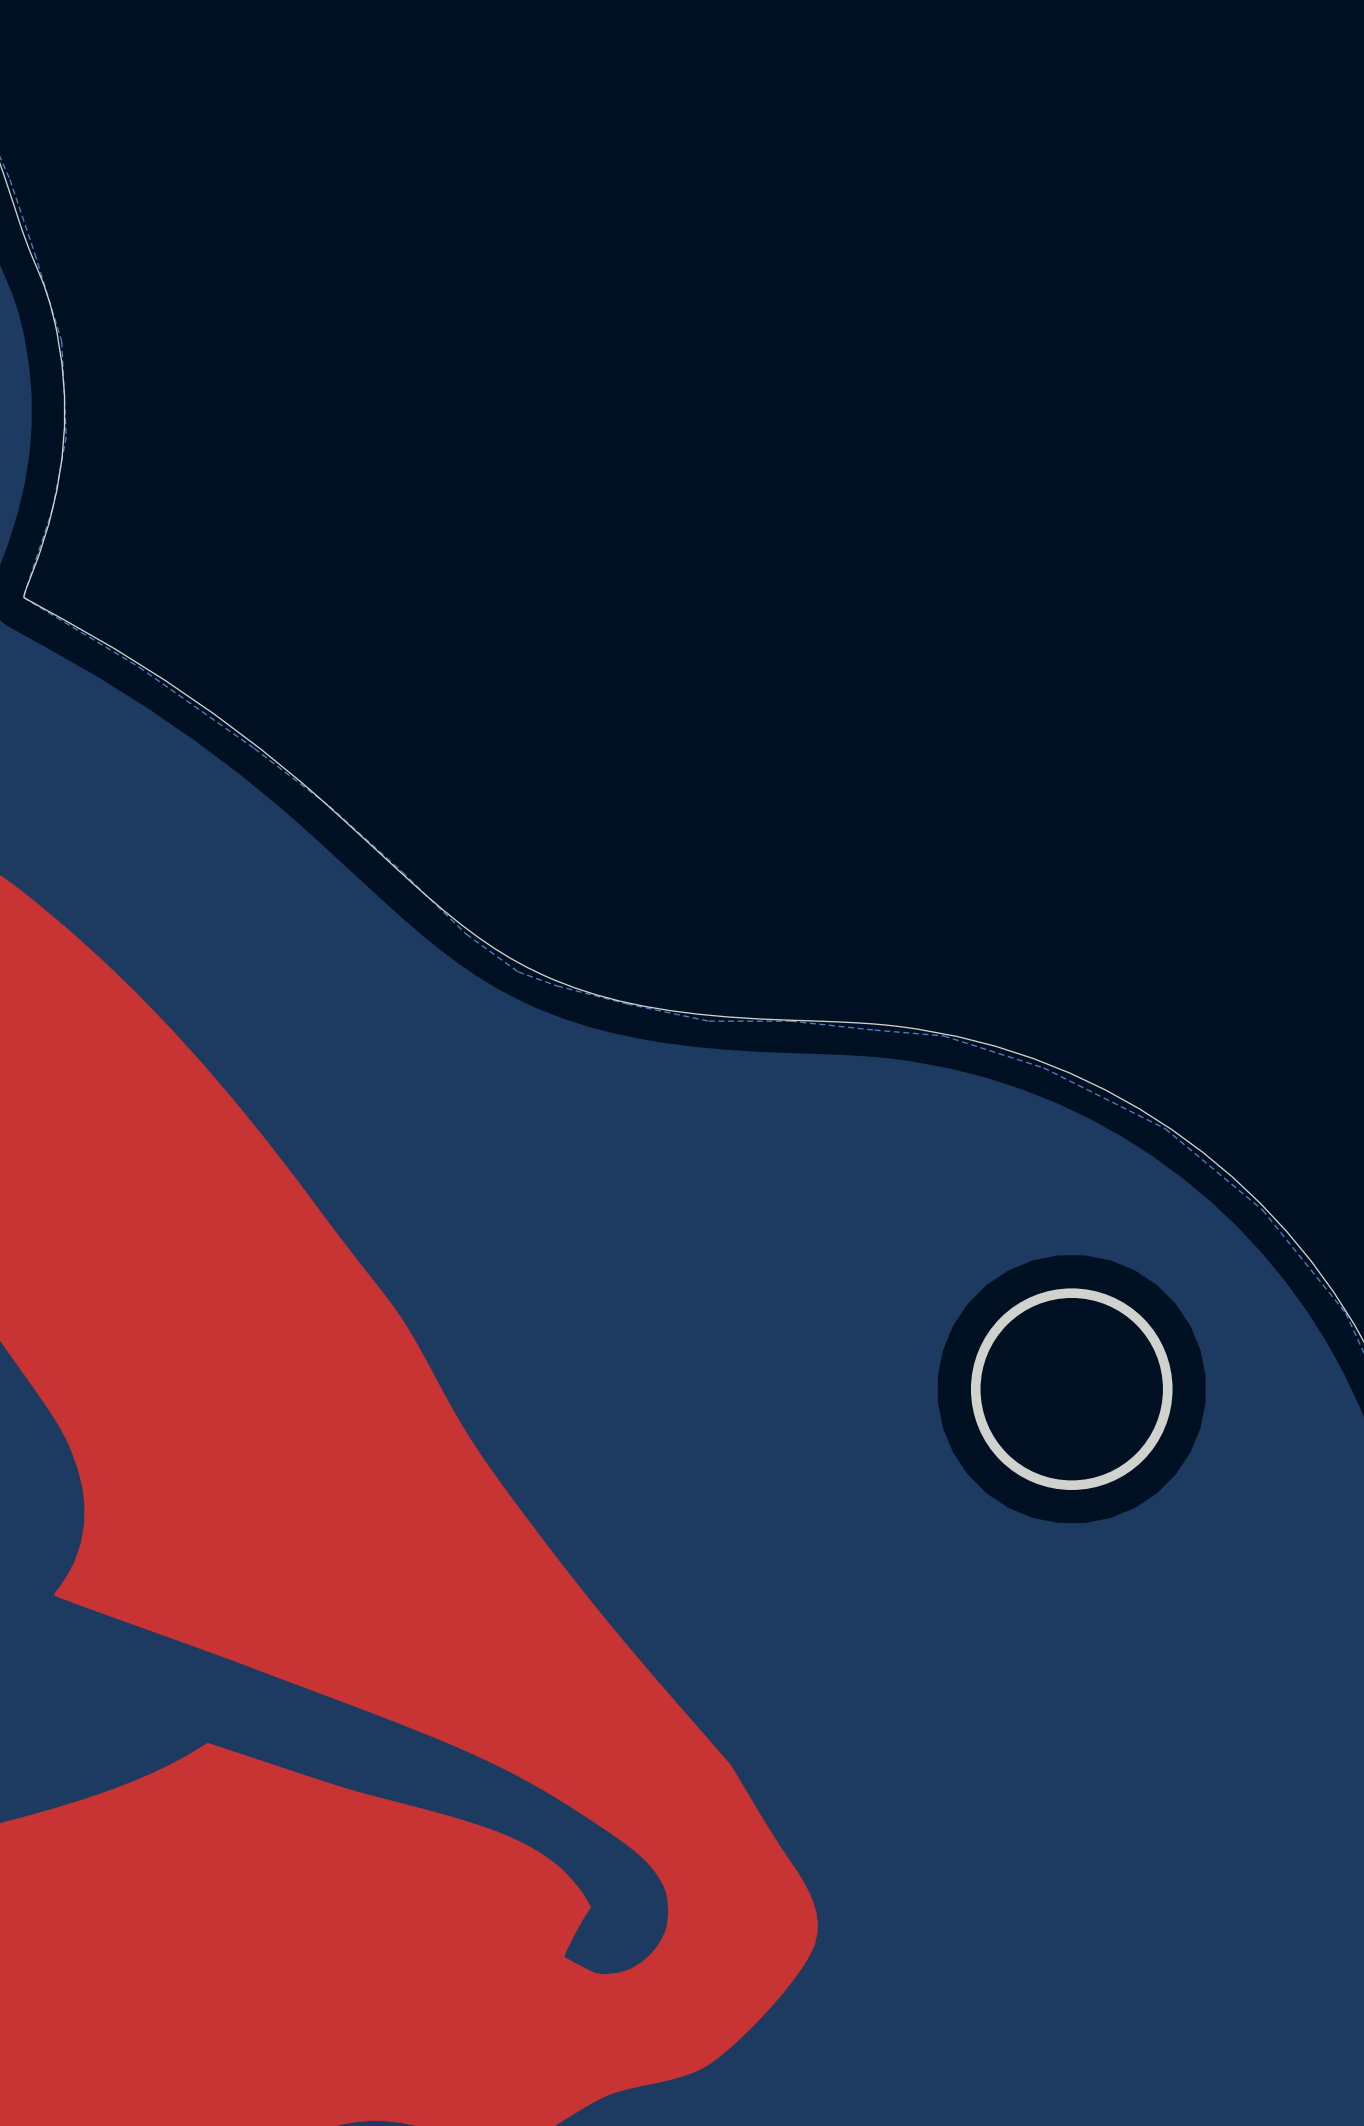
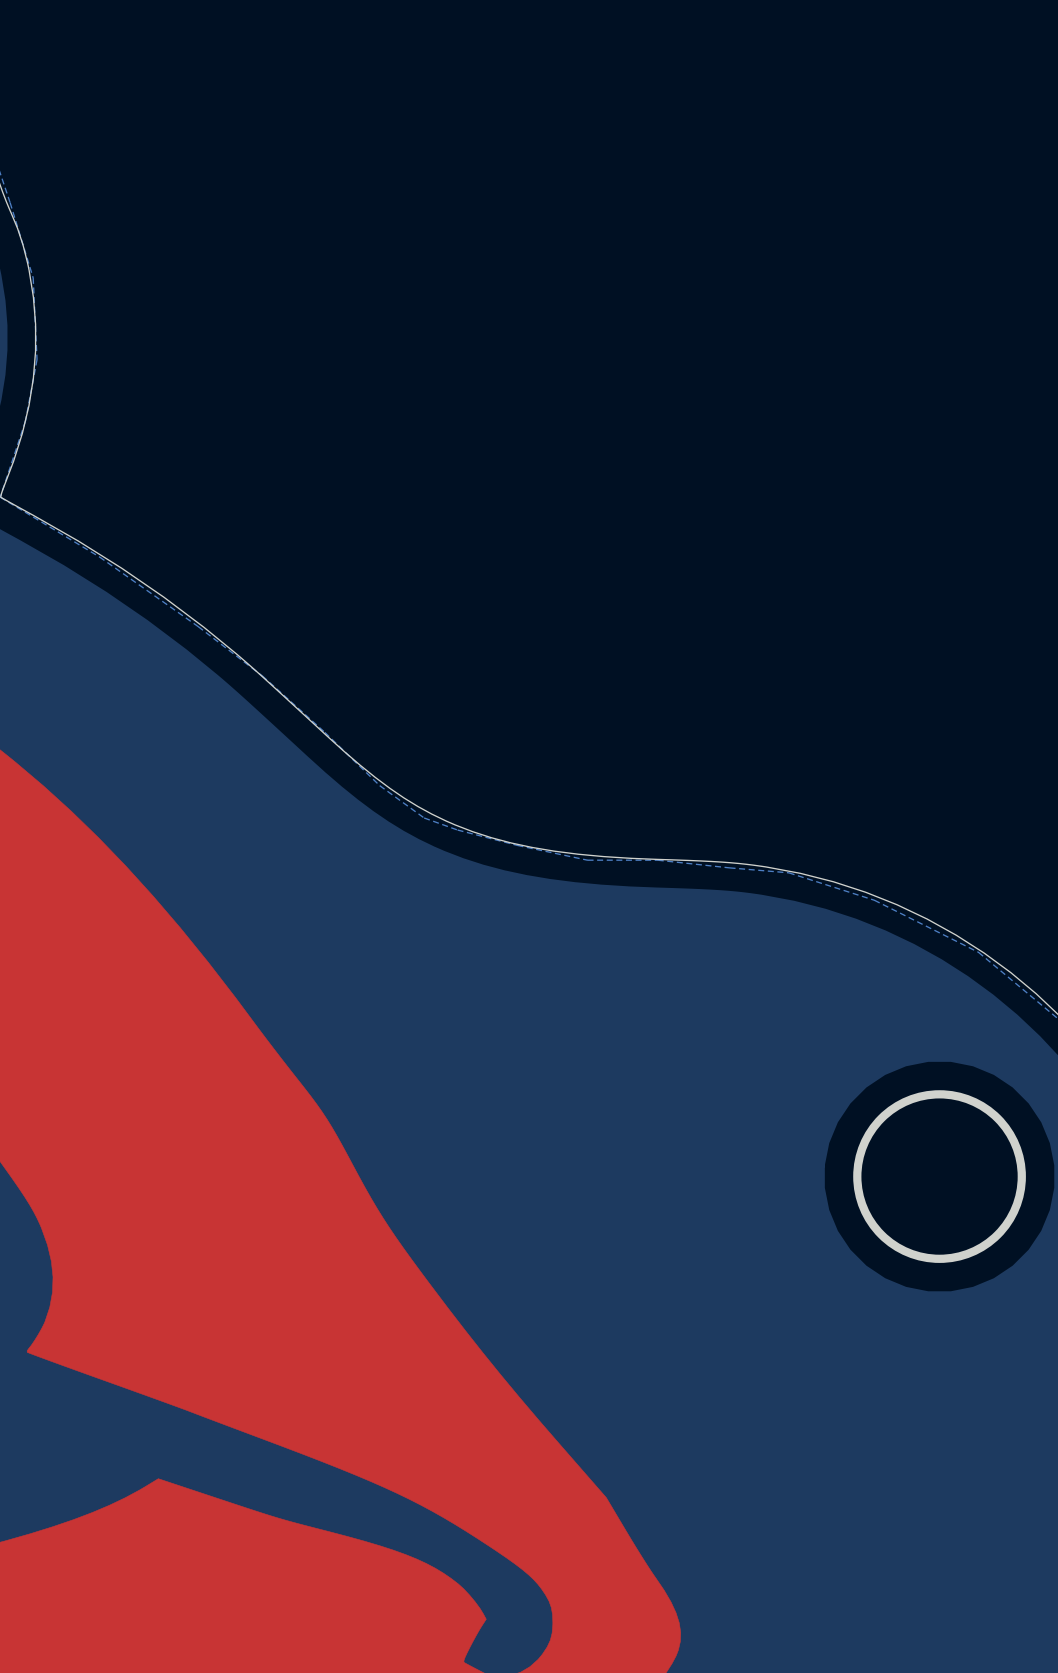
round board edge position: (1071, 1389) -> (939, 1176)

